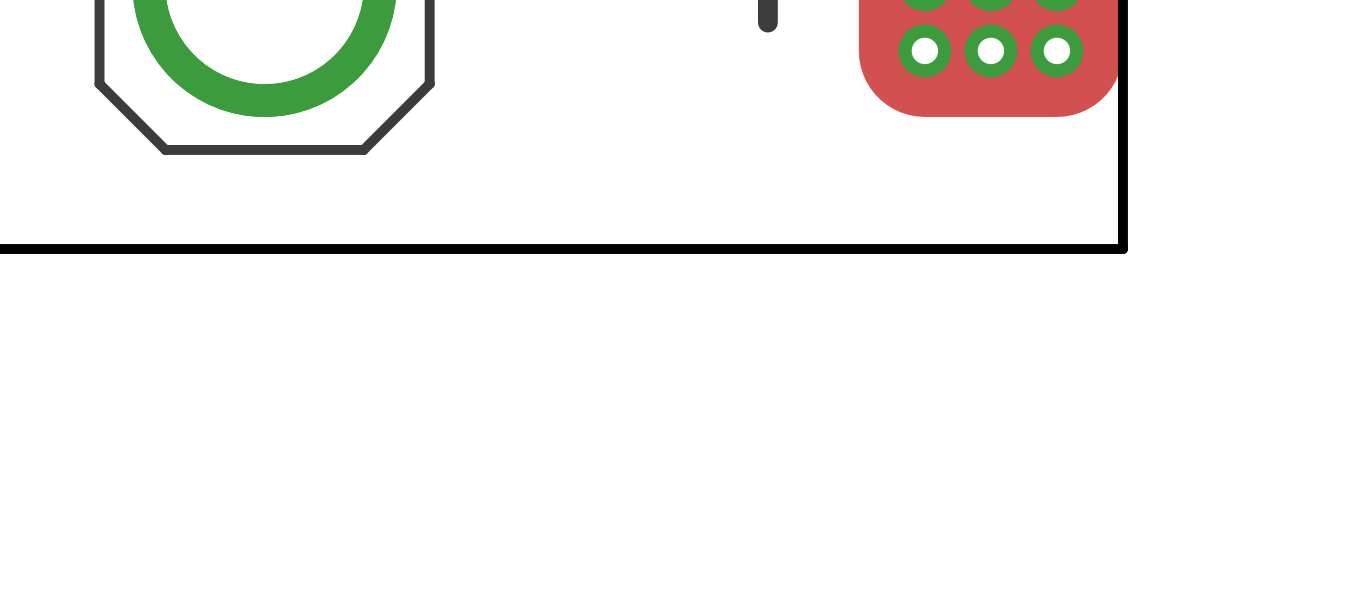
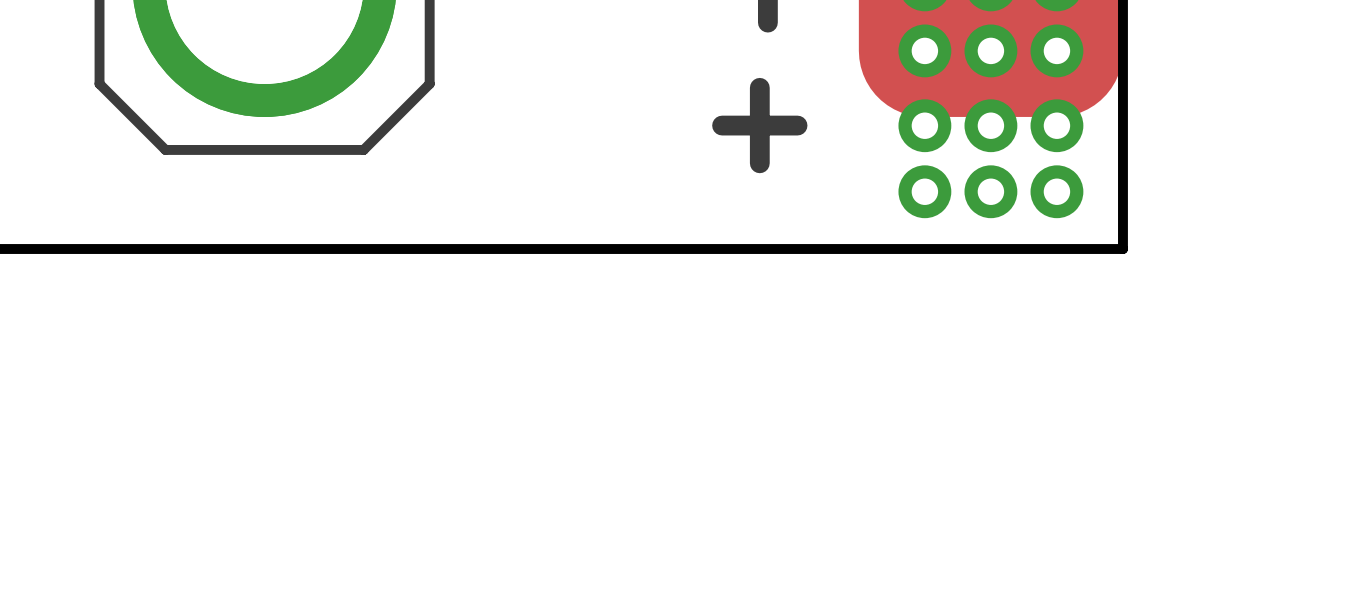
text: none -> + (759, 125)
via: none -> (924, 125)
via: none -> (990, 125)
via: none -> (1056, 125)
via: none -> (924, 191)
via: none -> (990, 191)
via: none -> (1056, 191)

